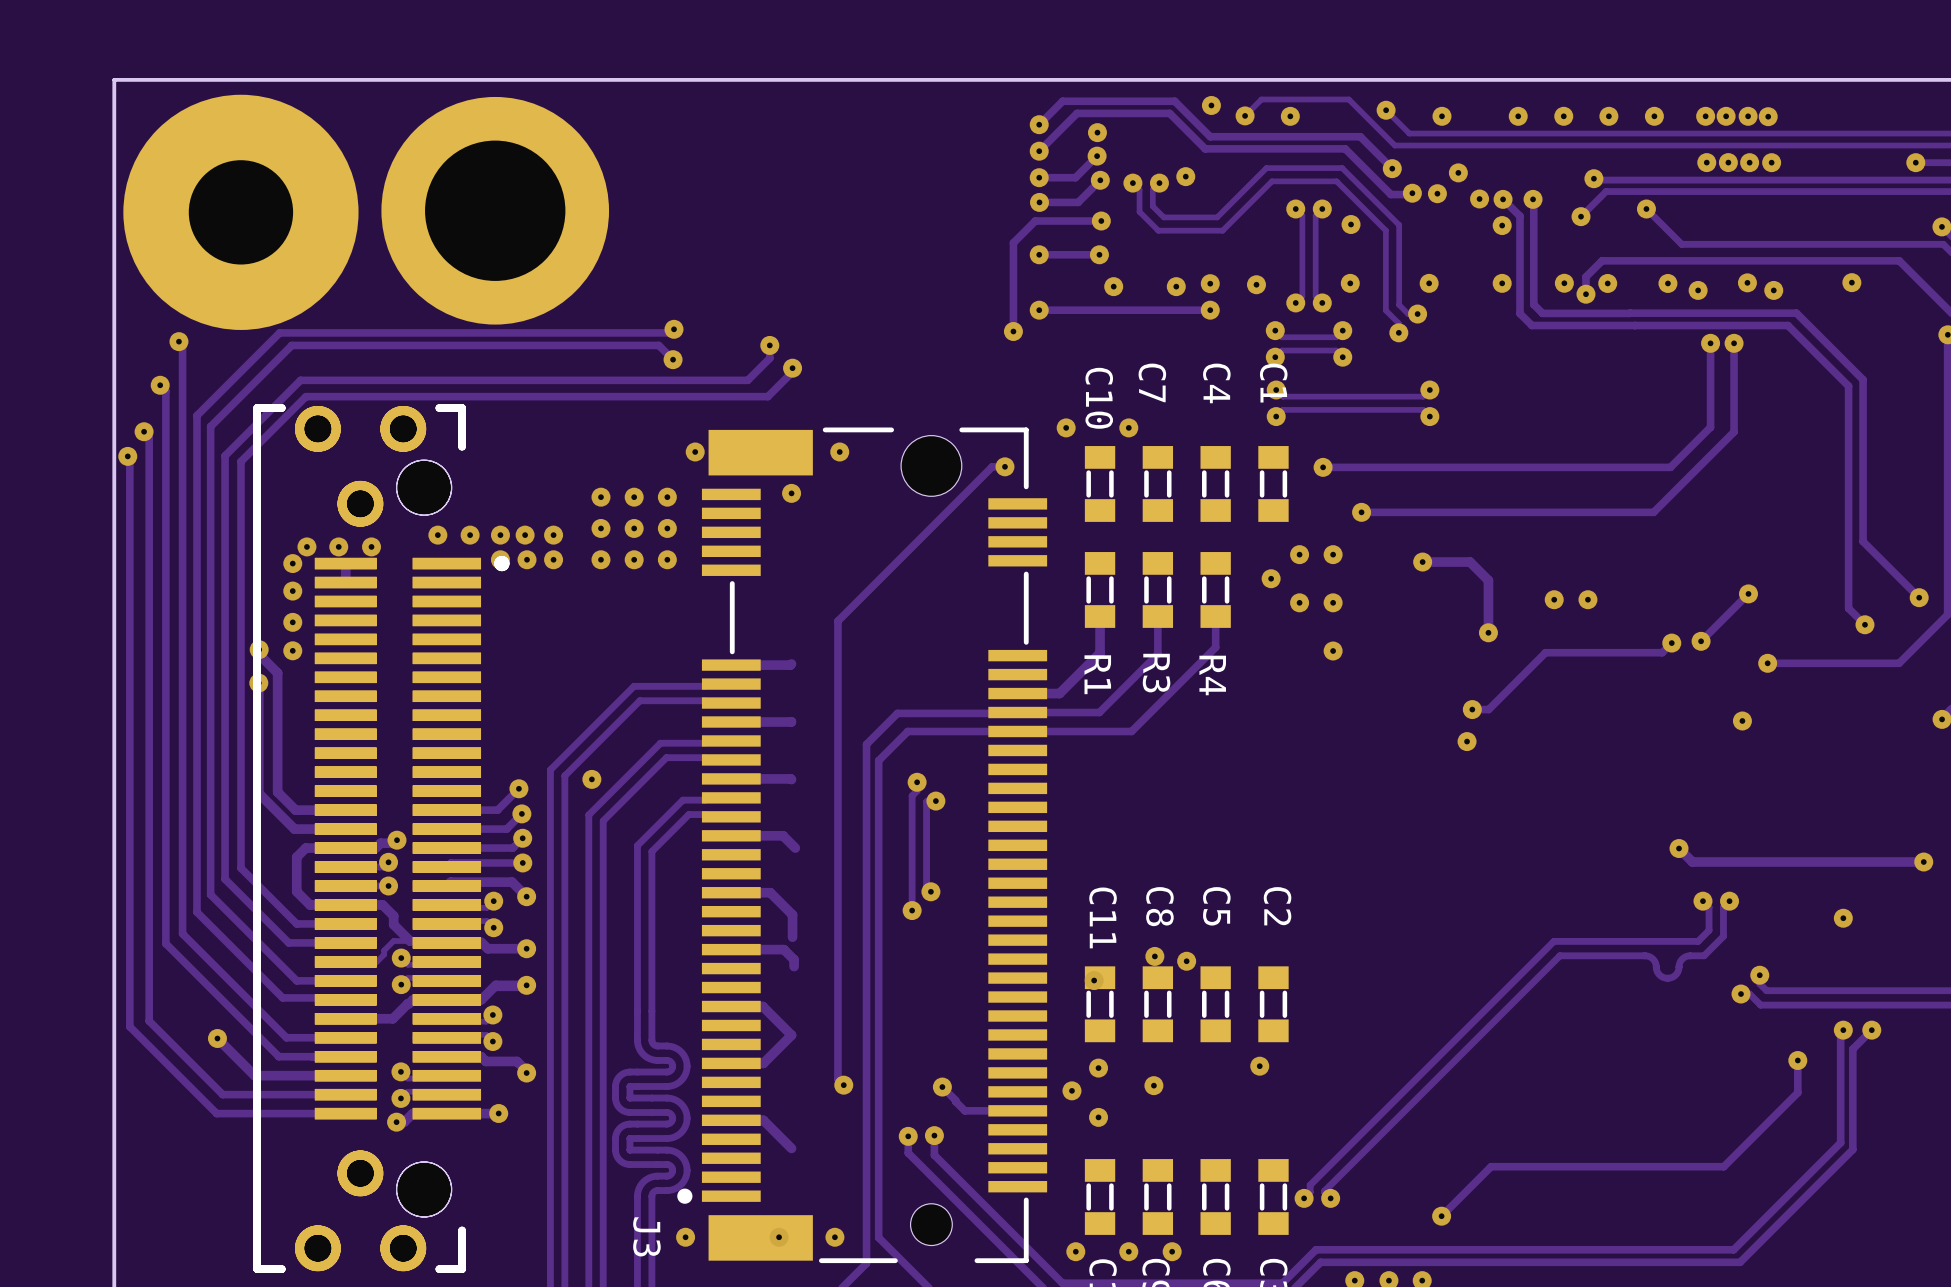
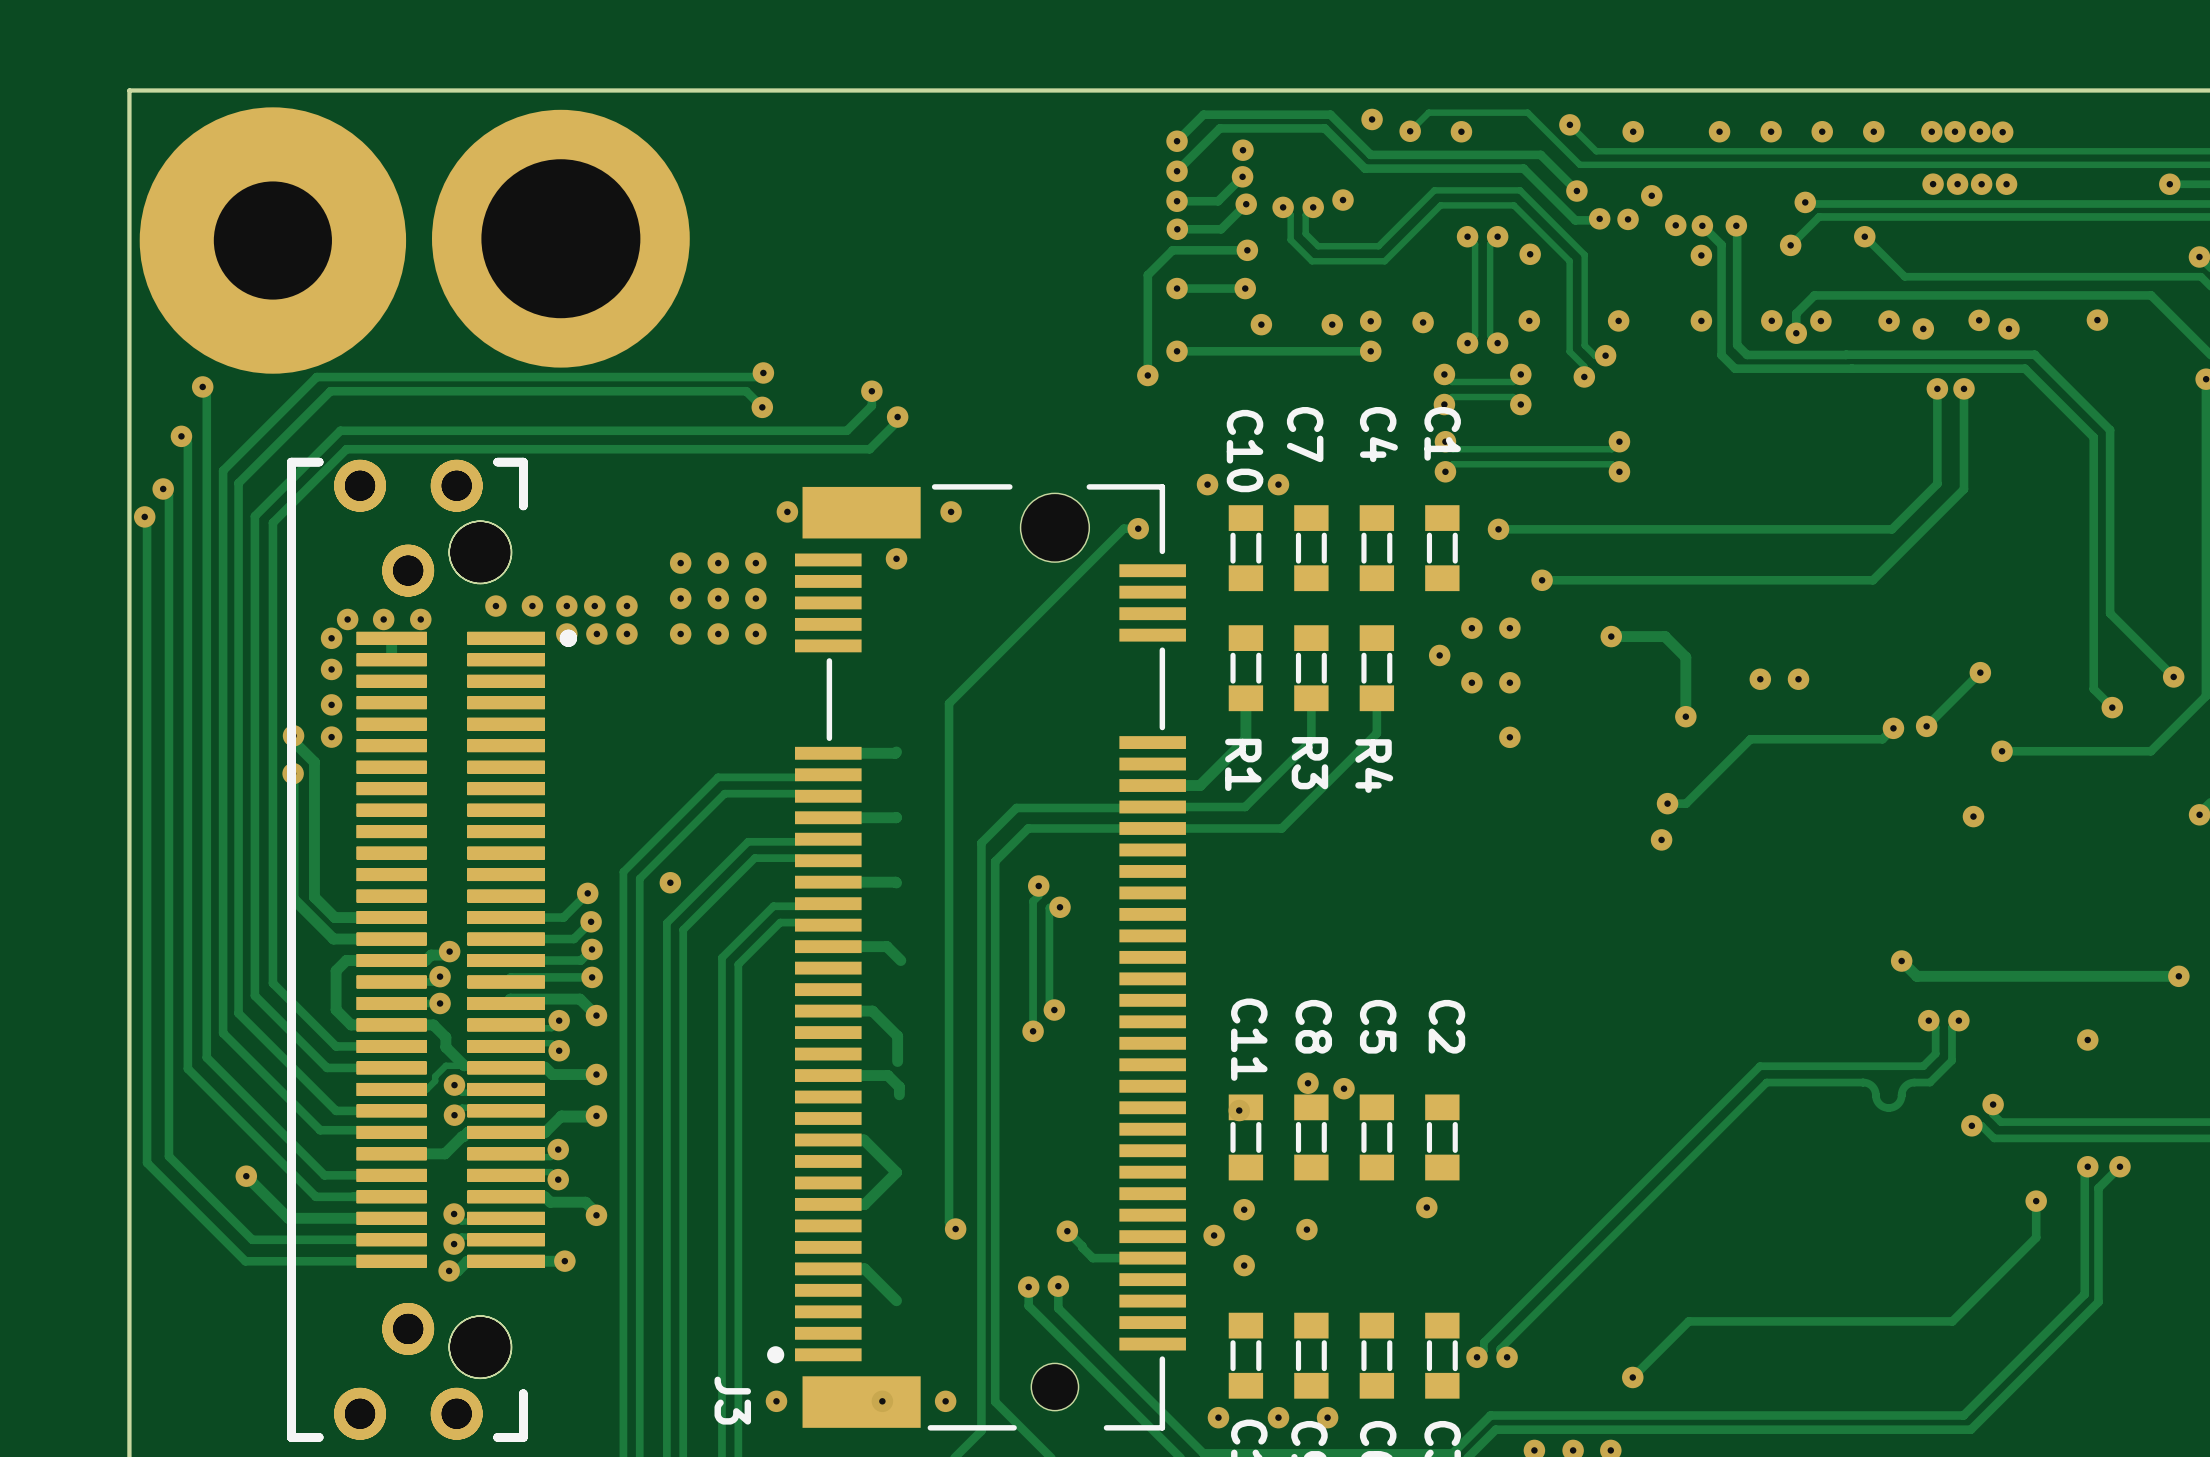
track: (637, 1040) (640, 1050) (645, 1056) (655, 1060) (668, 1060) (672, 1066) (667, 1071) (626, 1072) (619, 1076) (616, 1082) (616, 1101) (622, 1110) (630, 1112) (667, 1112) (672, 1117) (671, 1121) (667, 1124) (626, 1124) (616, 1133) (616, 1153) (622, 1162) (630, 1164) (667, 1164) (672, 1168) (669, 1175) (655, 1176) (645, 1180) (638, 1188) (637, 1196) -> (721, 1178) (721, 1354)
track: (651, 1040) (655, 1045) (669, 1046) (679, 1050) (684, 1056) (687, 1066) (684, 1076) (674, 1084) (629, 1086) (630, 1098) (672, 1098) (681, 1103) (686, 1113) (685, 1126) (681, 1132) (674, 1136) (629, 1138) (630, 1150) (672, 1150) (679, 1154) (685, 1162) (686, 1172) (681, 1184) (672, 1189) (655, 1190) (651, 1196) -> (738, 1178) (738, 1354)

